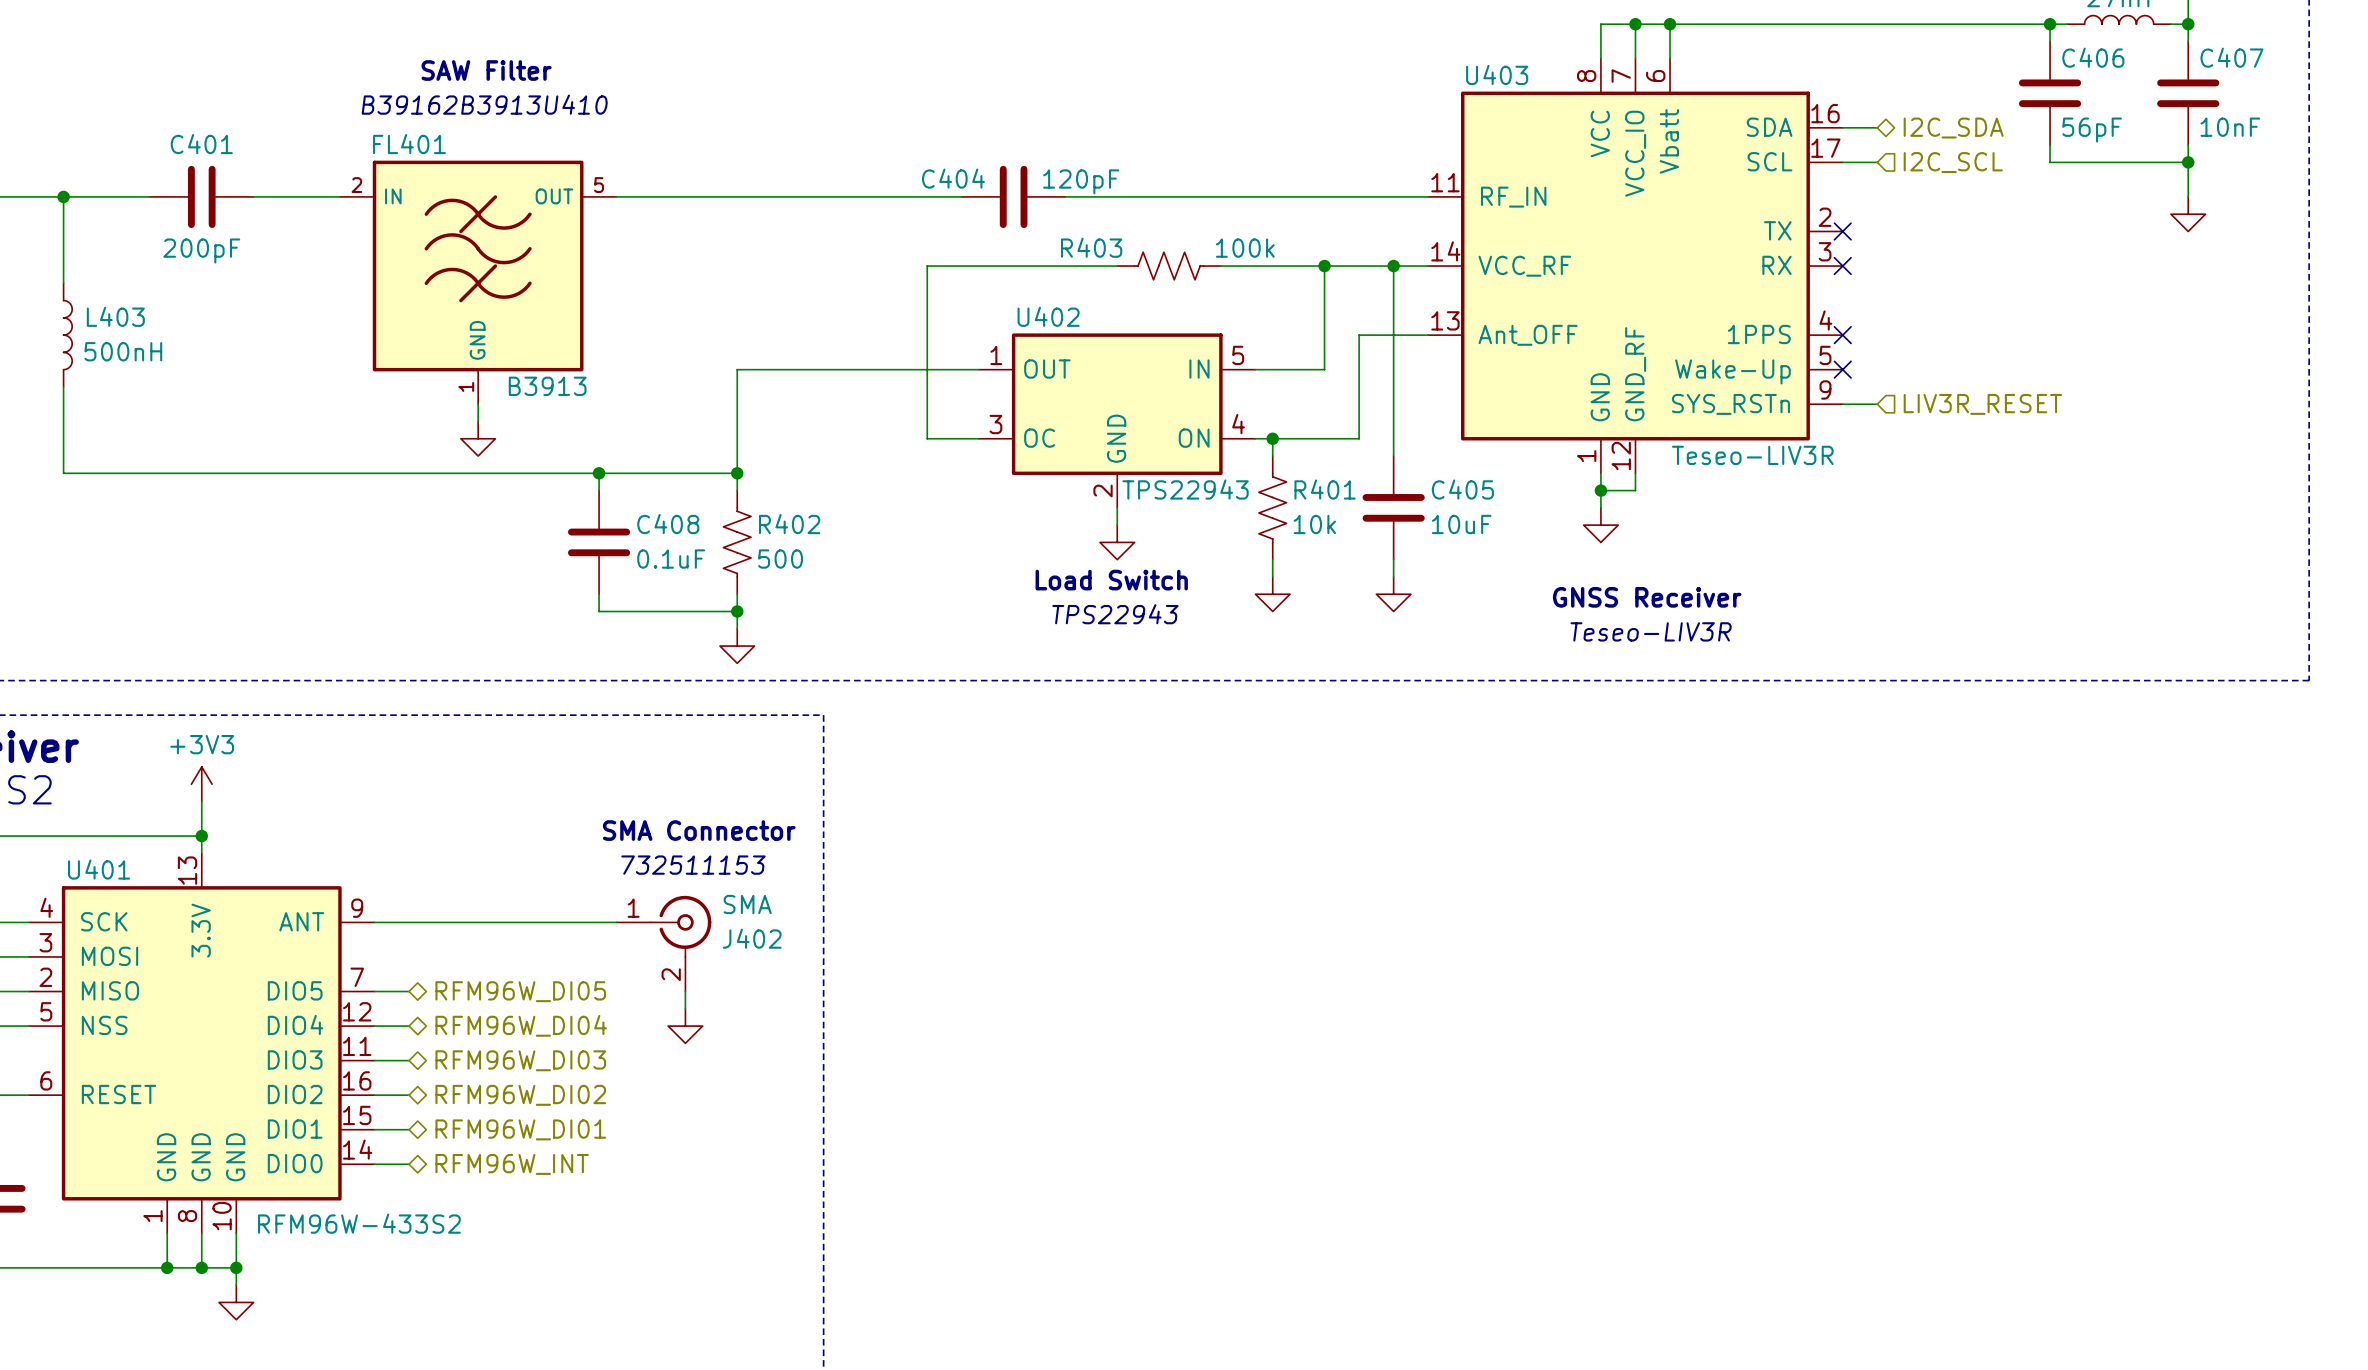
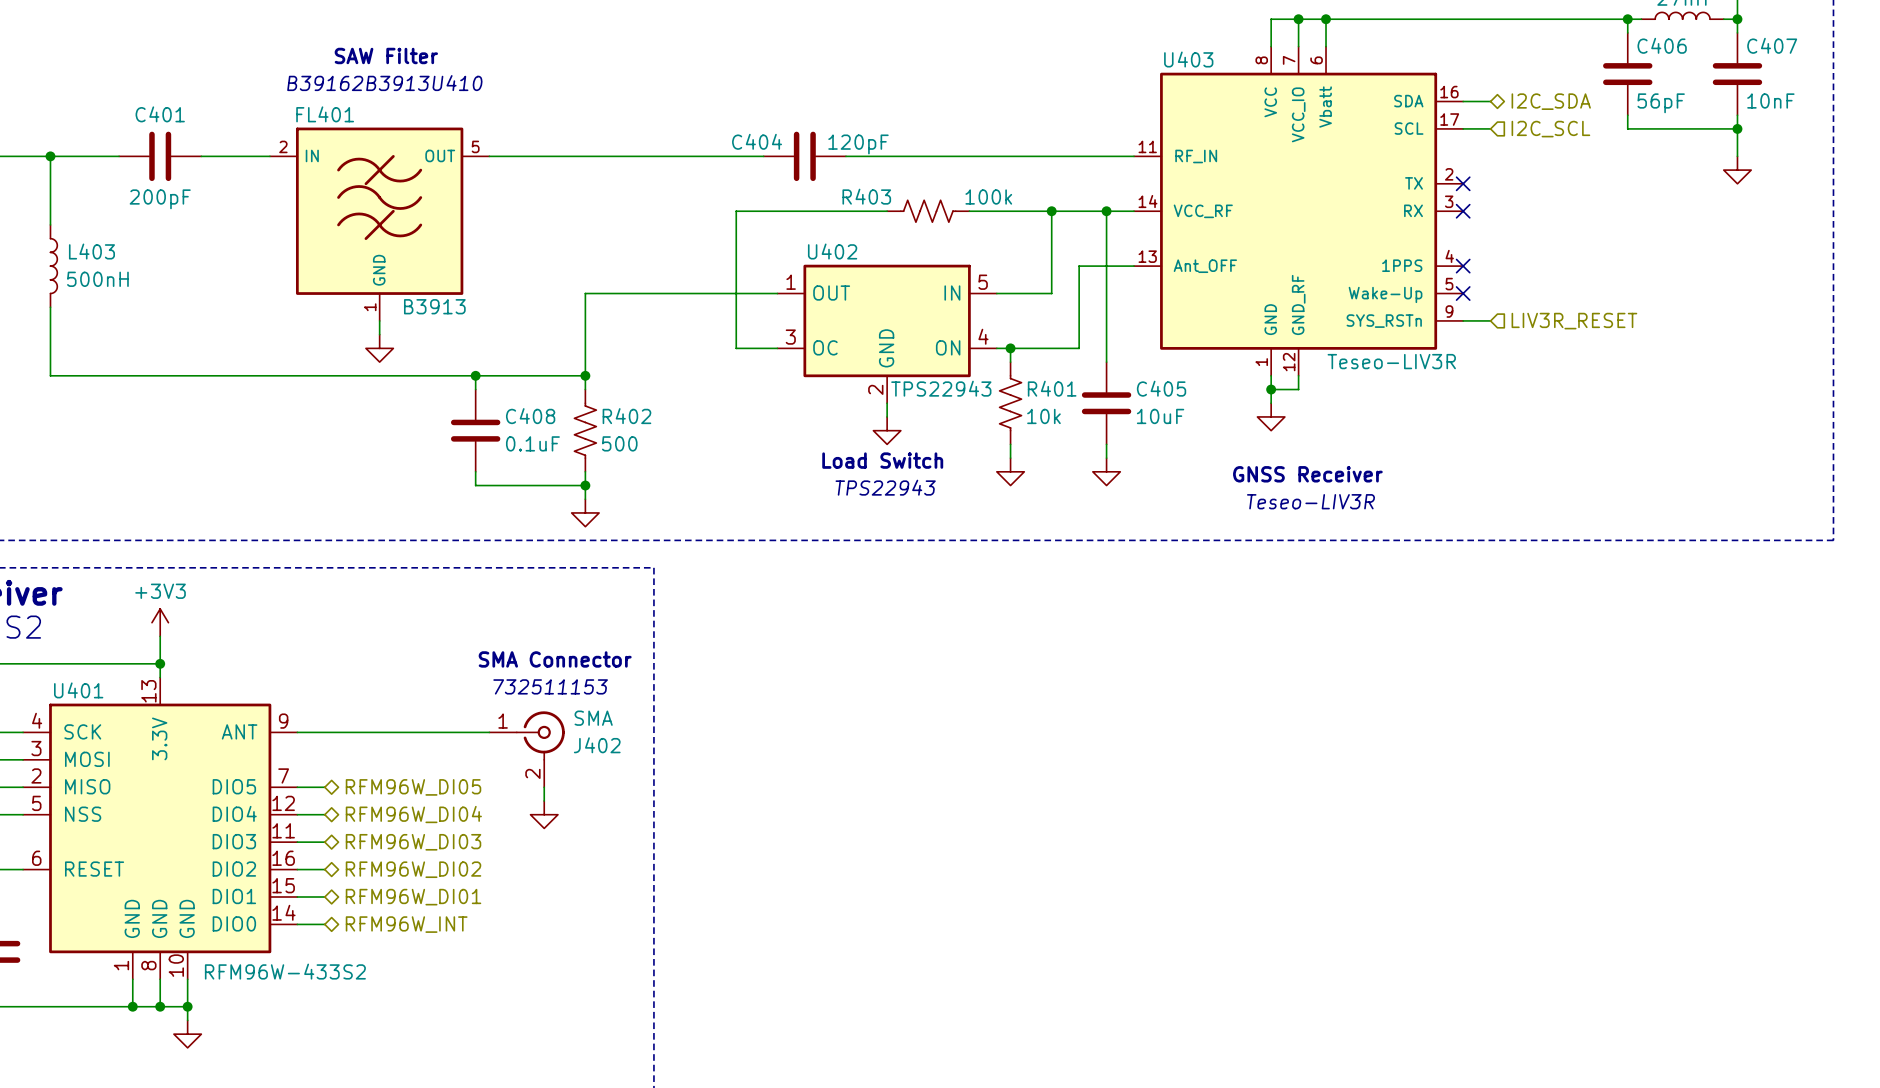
U403 symbol: [1428, 58, 1843, 474] -> [1133, 46, 1464, 376]

